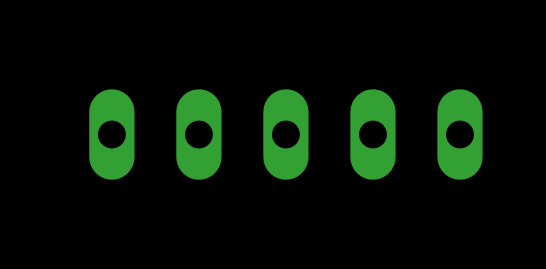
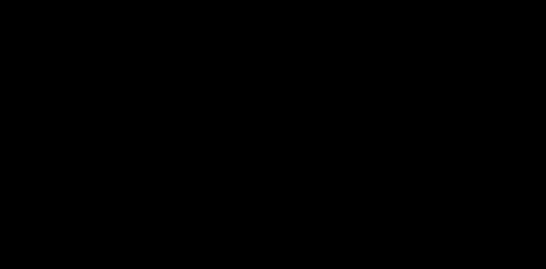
part: (285, 134) -> none

